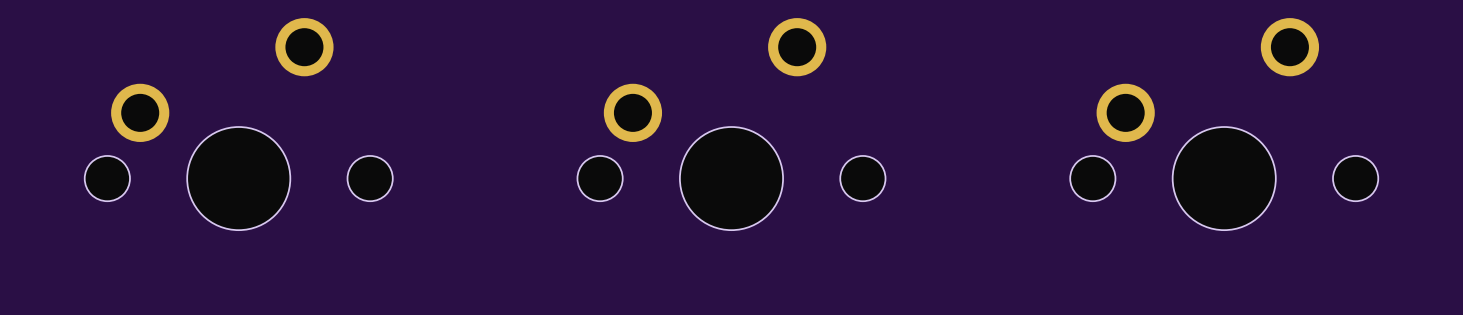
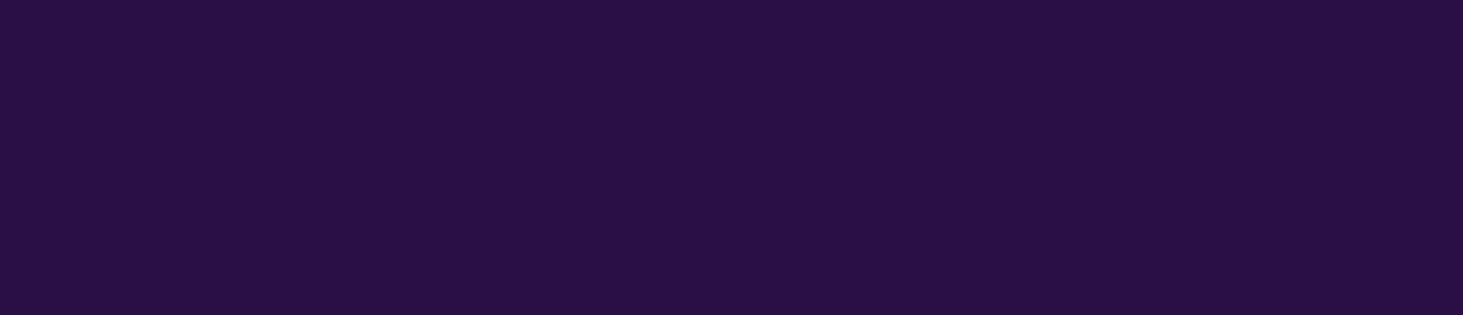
part: (238, 124) -> none
part: (731, 124) -> none
part: (1224, 124) -> none

